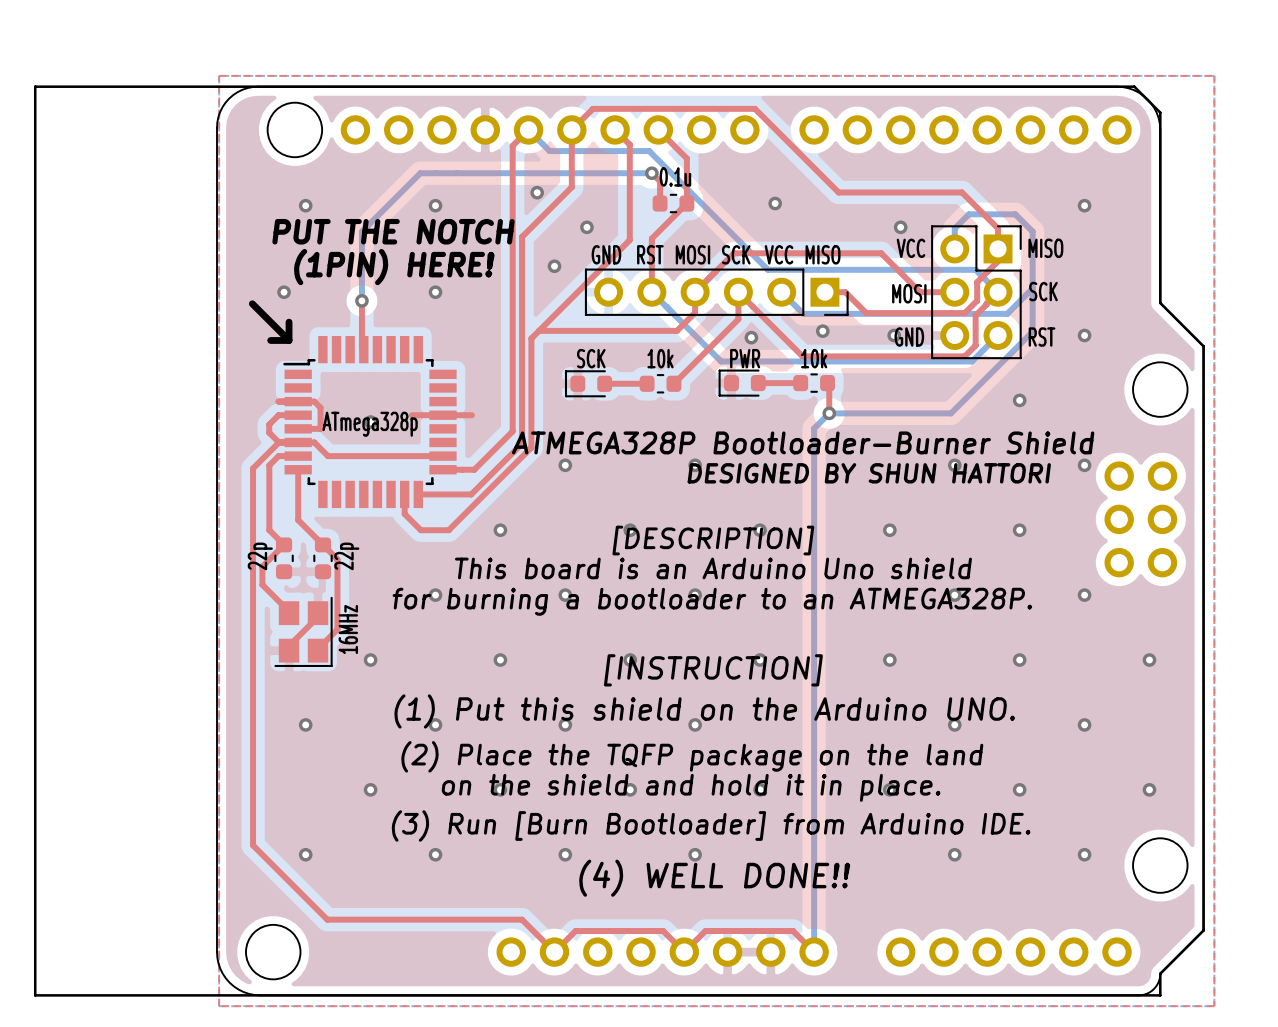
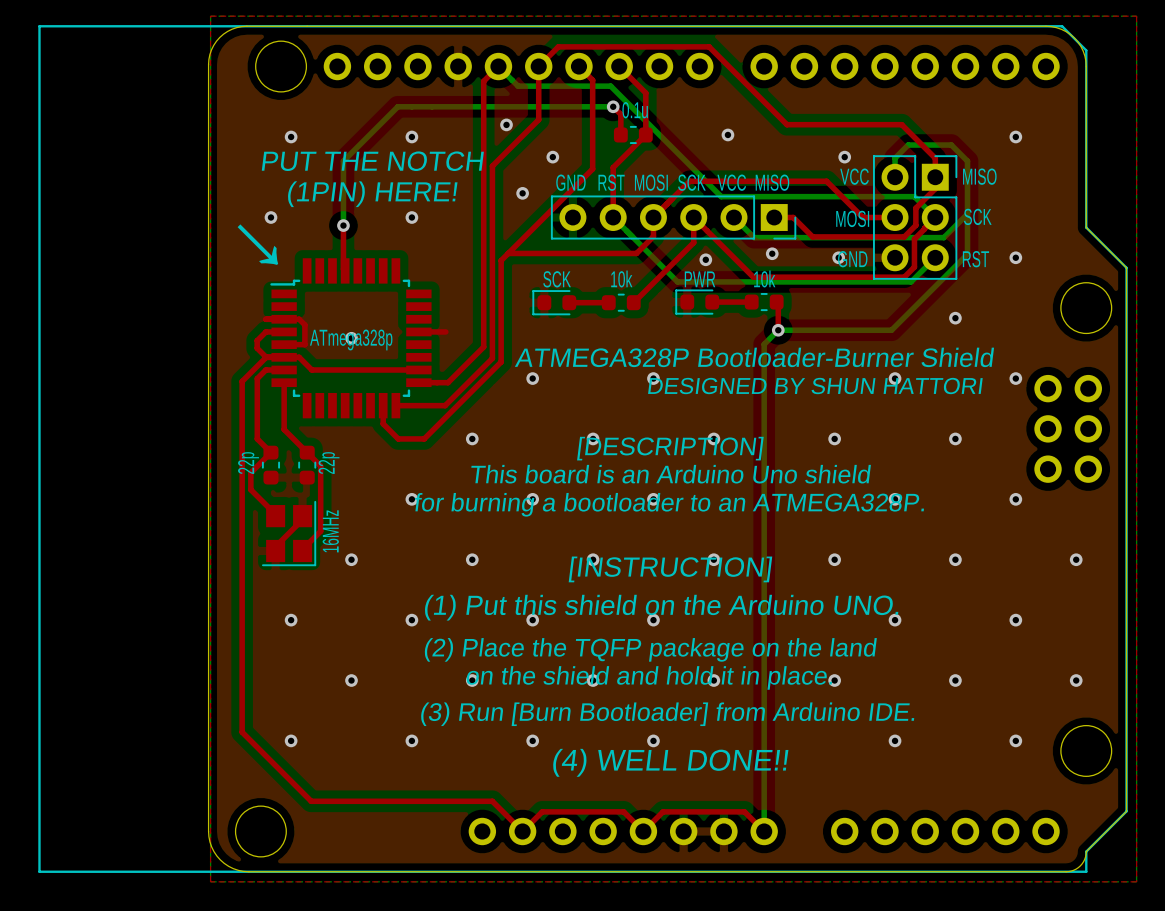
top track: (412, 415) (443, 415) -> none

